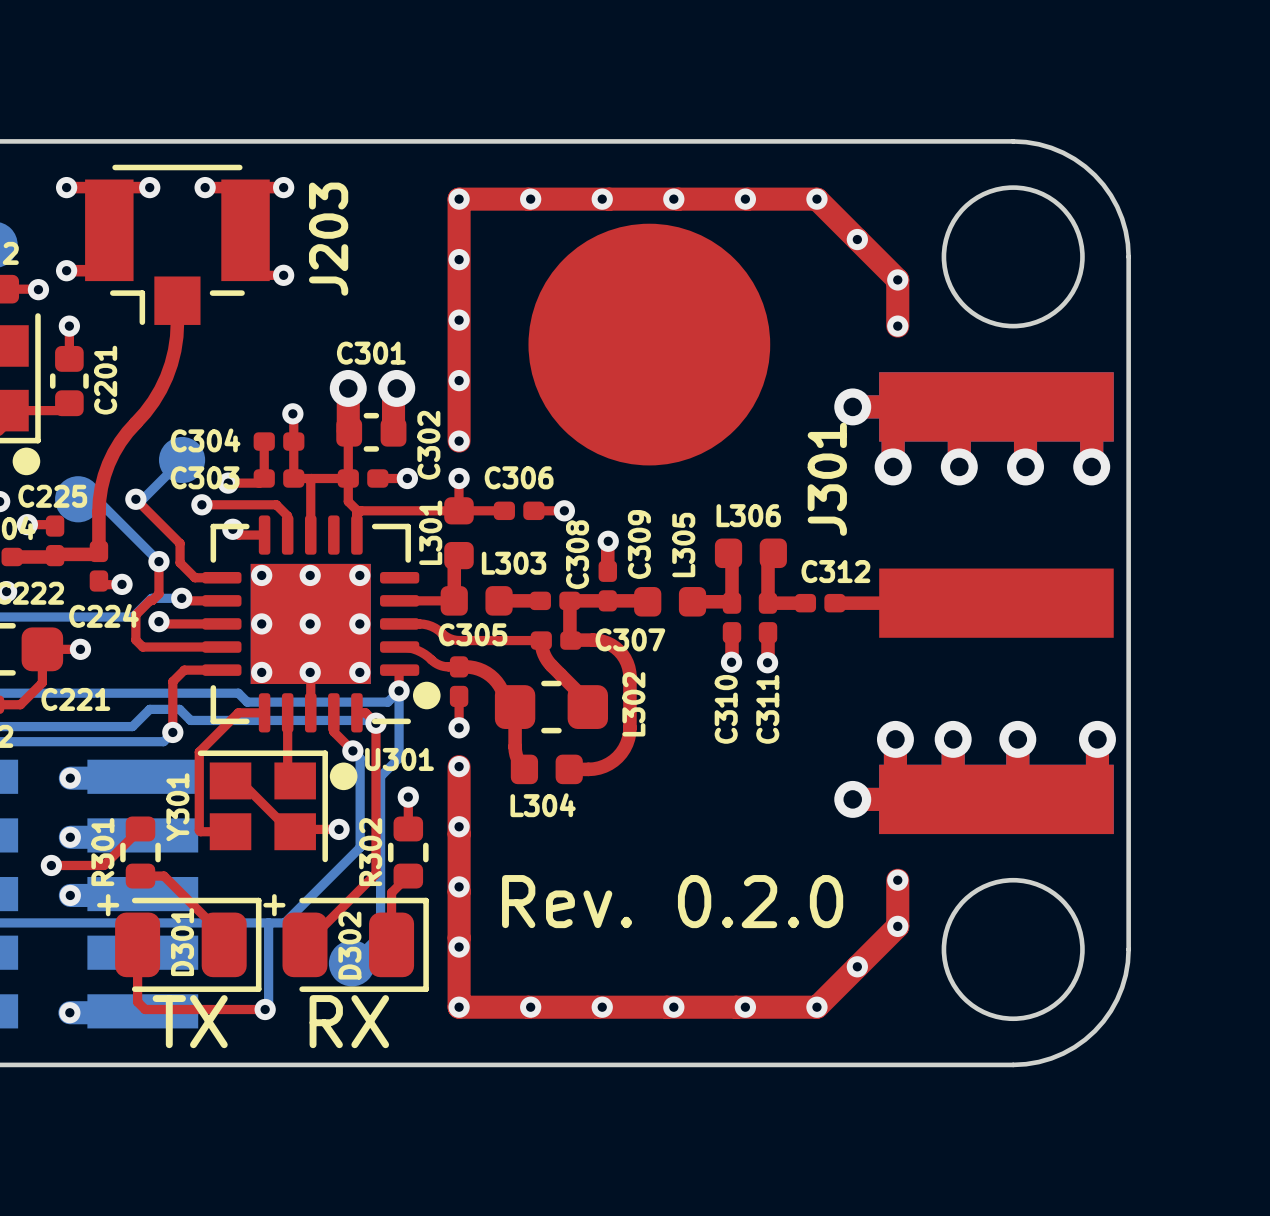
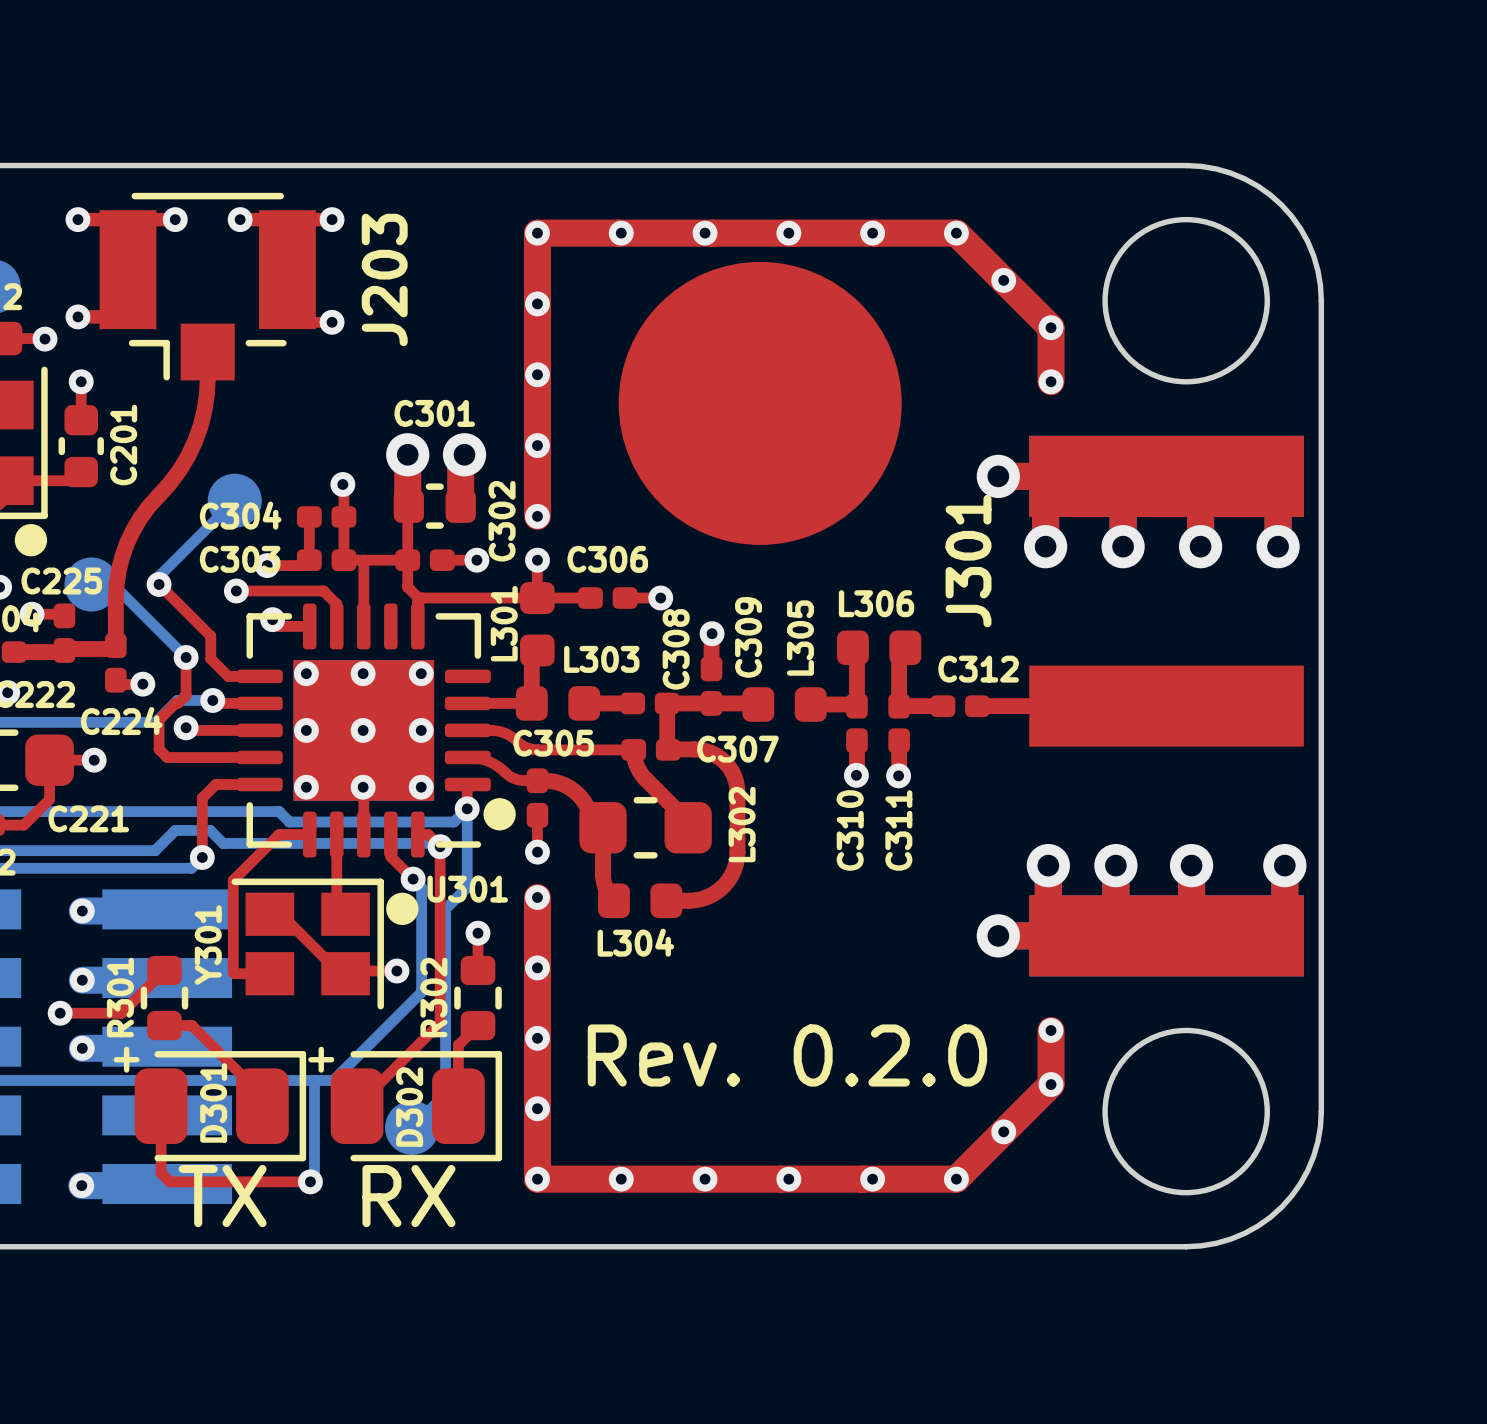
bottom track: (182, 460) (142, 499) (135, 499) -> (234, 500) (159, 576) (159, 584)
part position: (182, 460) -> (234, 500)

